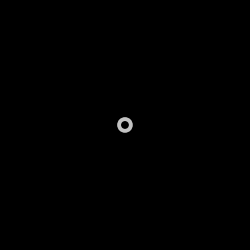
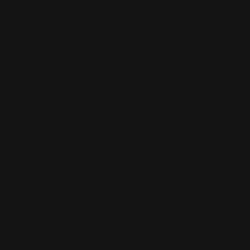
via: (124, 124) -> none

